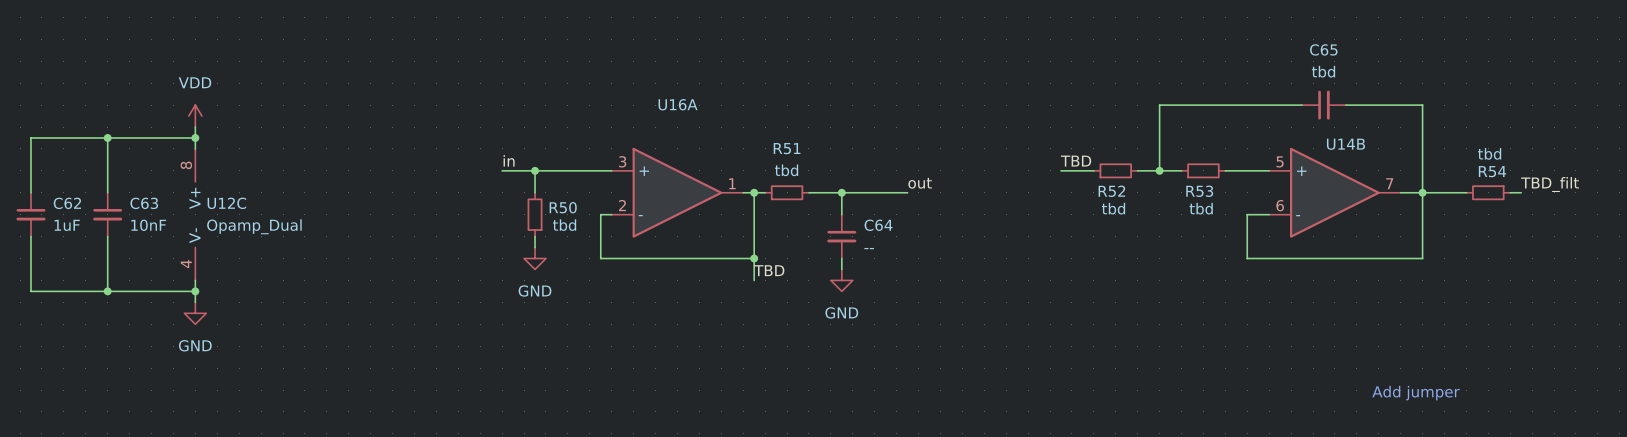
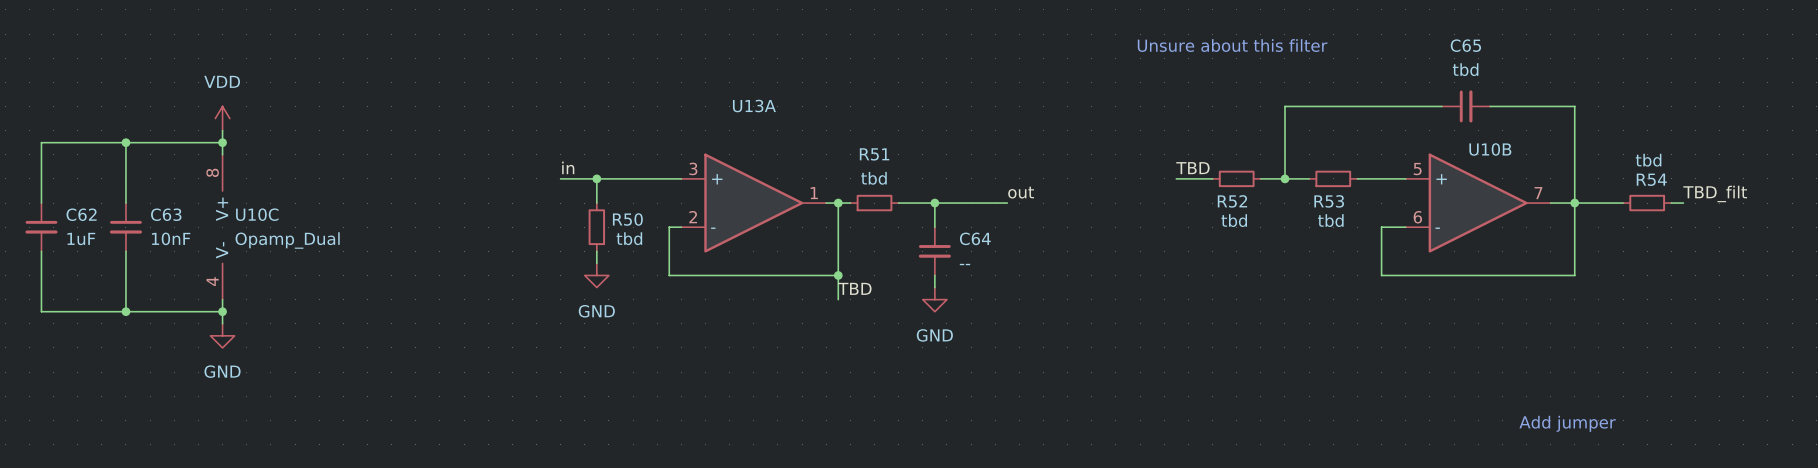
text: none -> Unsure about this filter (1232, 45)
U16A name: U16A (678, 104) -> U13A (754, 106)
U14B name: U14B (1345, 144) -> U10B (1490, 149)
U12C name: U12C (226, 203) -> U10C (257, 214)

